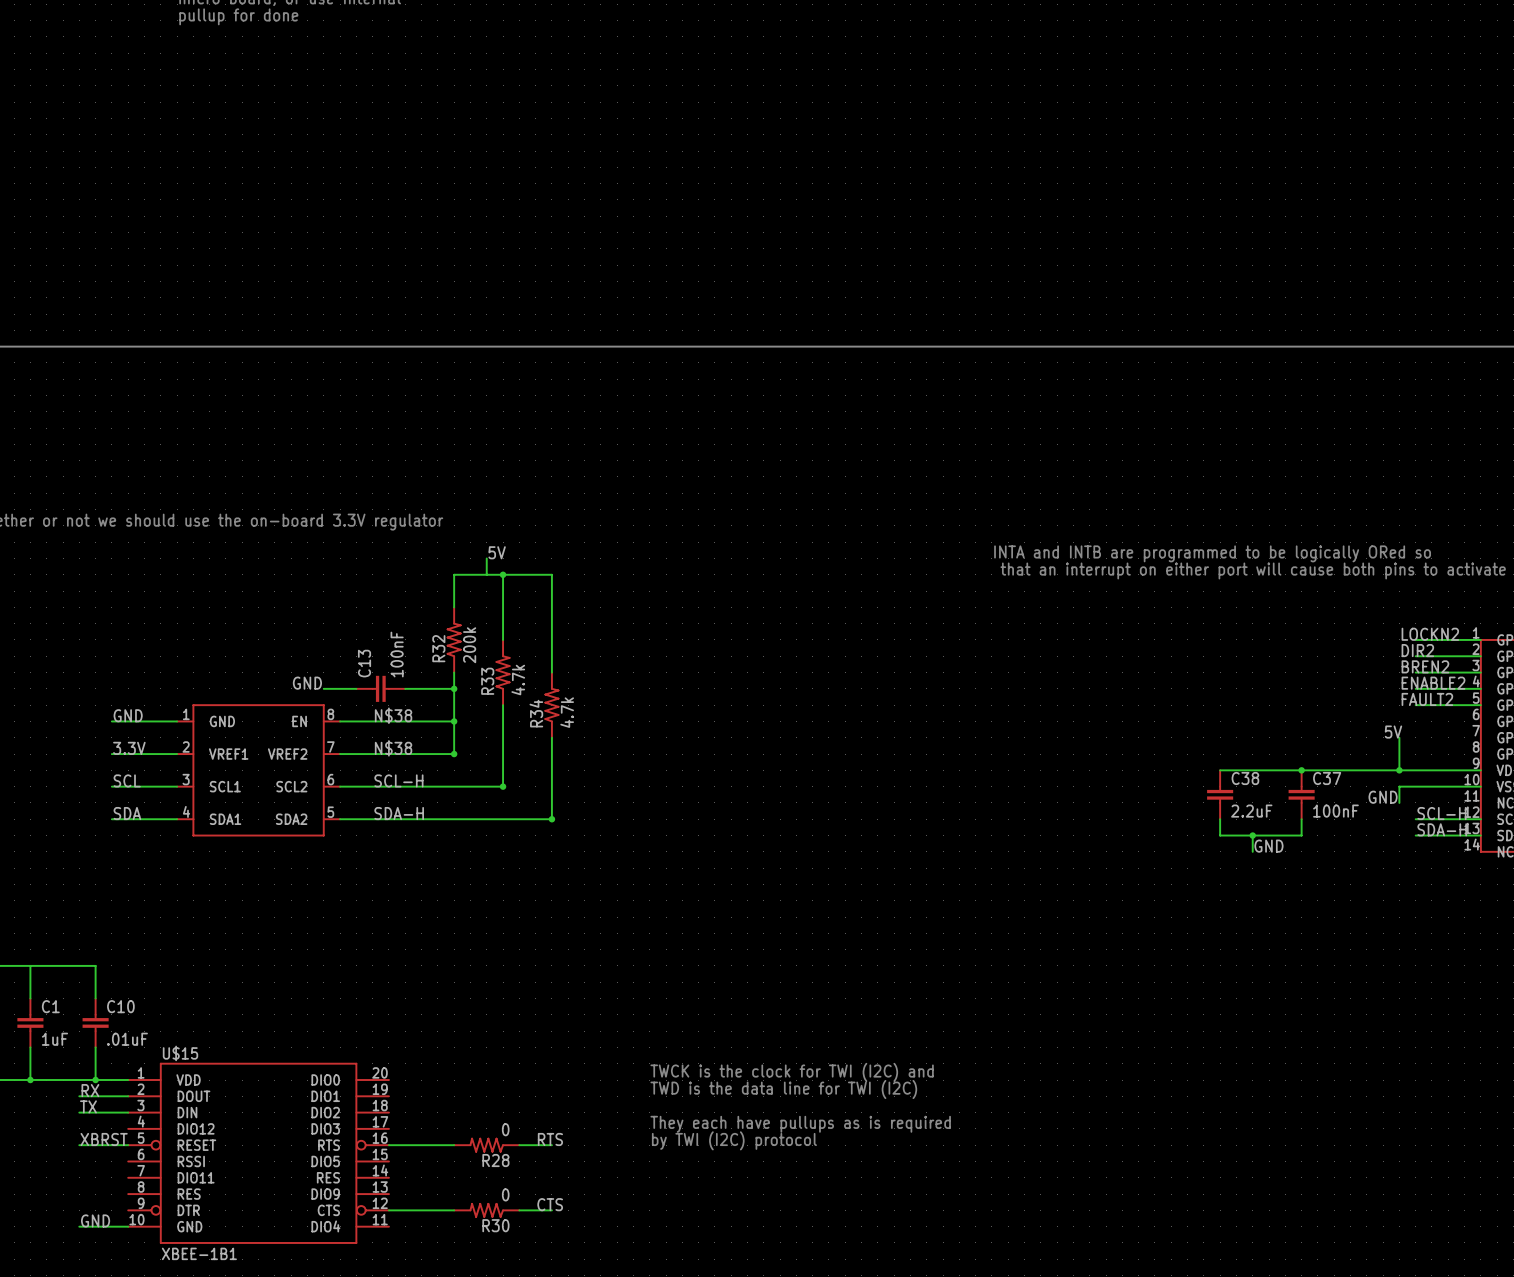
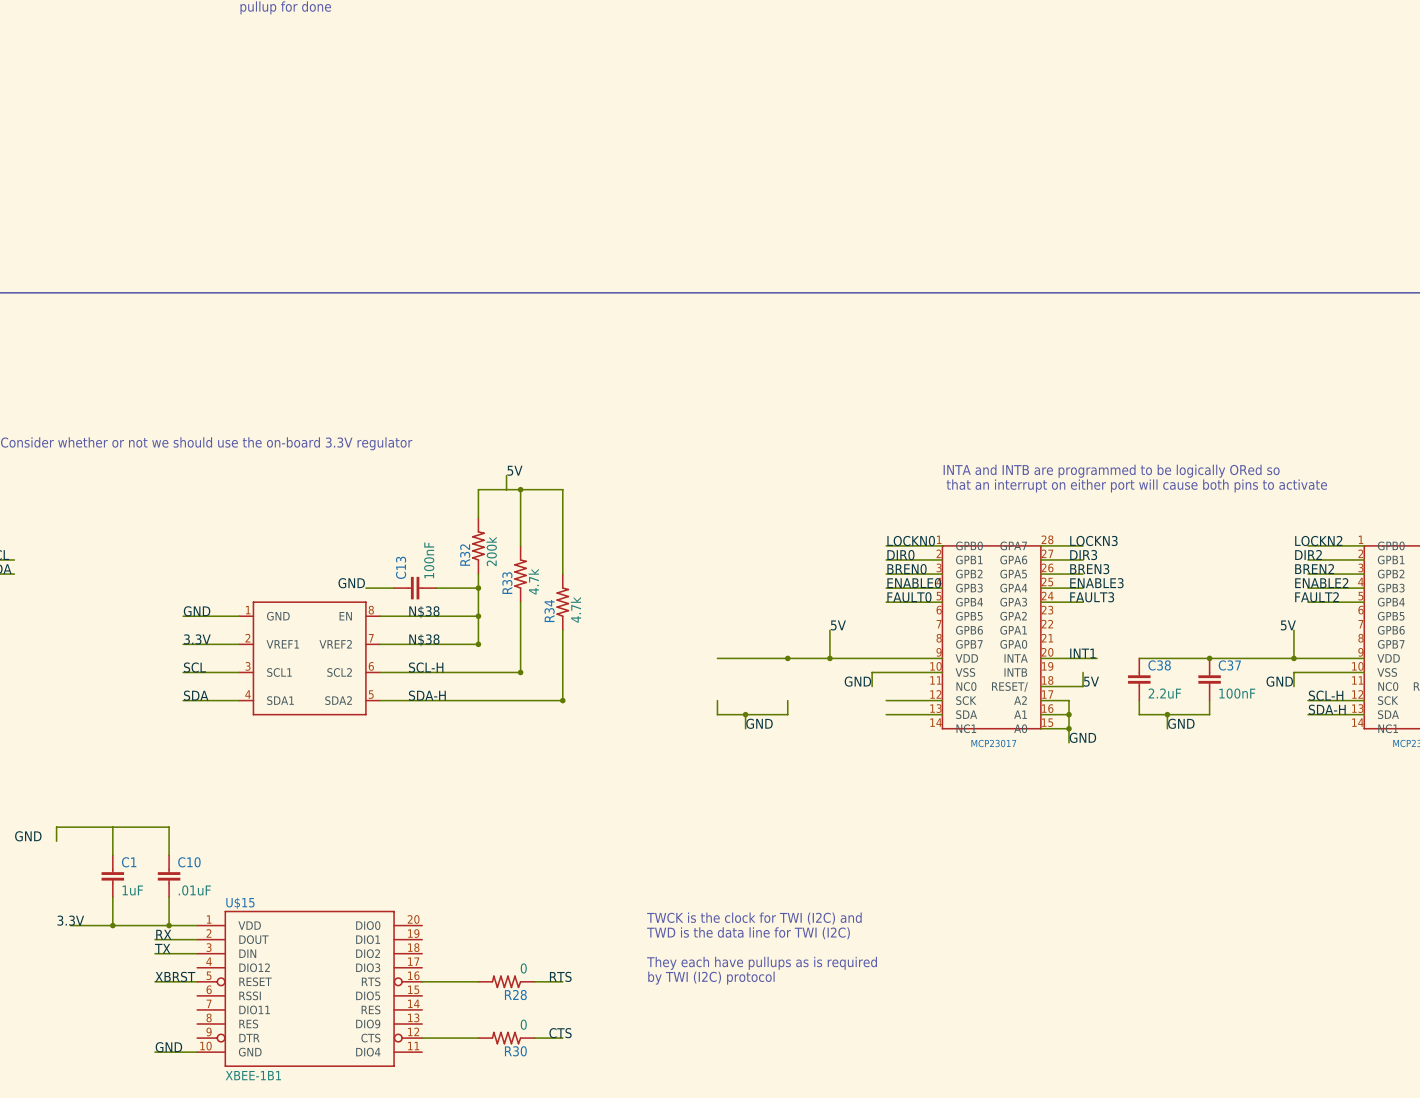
label: none -> LOCKN0 (911, 541)
label: none -> LOCKN3 (1093, 541)
wire: none -> (886, 545) (942, 545)
wire: none -> (1040, 545) (1083, 545)
label: none -> DIR0 (900, 555)
label: none -> DIR3 (1083, 555)
wire: none -> (886, 559) (942, 559)
wire: none -> (1040, 559) (1083, 559)
label: none -> BREN0 (907, 569)
label: none -> BREN3 (1089, 569)
wire: none -> (886, 574) (942, 574)
wire: none -> (1040, 574) (1083, 574)
label: none -> ENABLE0 (914, 583)
label: none -> ENABLE3 (1096, 583)
wire: none -> (886, 588) (942, 588)
wire: none -> (1040, 588) (1083, 588)
label: none -> FAULT0 (909, 597)
label: none -> FAULT3 (1092, 597)
wire: none -> (886, 602) (942, 602)
wire: none -> (1040, 602) (1083, 602)
label: none -> 5V (838, 625)
wire: none -> (829, 630) (829, 658)
part: none -> (991, 637)
label: none -> INT1 (1082, 653)
wire: none -> (717, 658) (942, 658)
junction: none -> (787, 658)
junction: none -> (829, 658)
wire: none -> (1040, 658) (1097, 658)
wire: none -> (942, 672) (872, 672) (872, 686)
wire: none -> (1083, 672) (1083, 686) (1040, 686)
label: none -> GND (857, 681)
label: none -> 5V (1091, 681)
wire: none -> (717, 700) (717, 714) (787, 714) (787, 700)
wire: none -> (886, 700) (942, 700)
wire: none -> (1040, 700) (1068, 700) (1068, 742)
wire: none -> (745, 714) (745, 728)
junction: none -> (745, 714)
wire: none -> (886, 714) (942, 714)
wire: none -> (1040, 714) (1068, 714)
junction: none -> (1068, 714)
label: none -> GND (759, 723)
wire: none -> (1040, 728) (1068, 728)
junction: none -> (1068, 728)
label: none -> GND (1082, 737)

